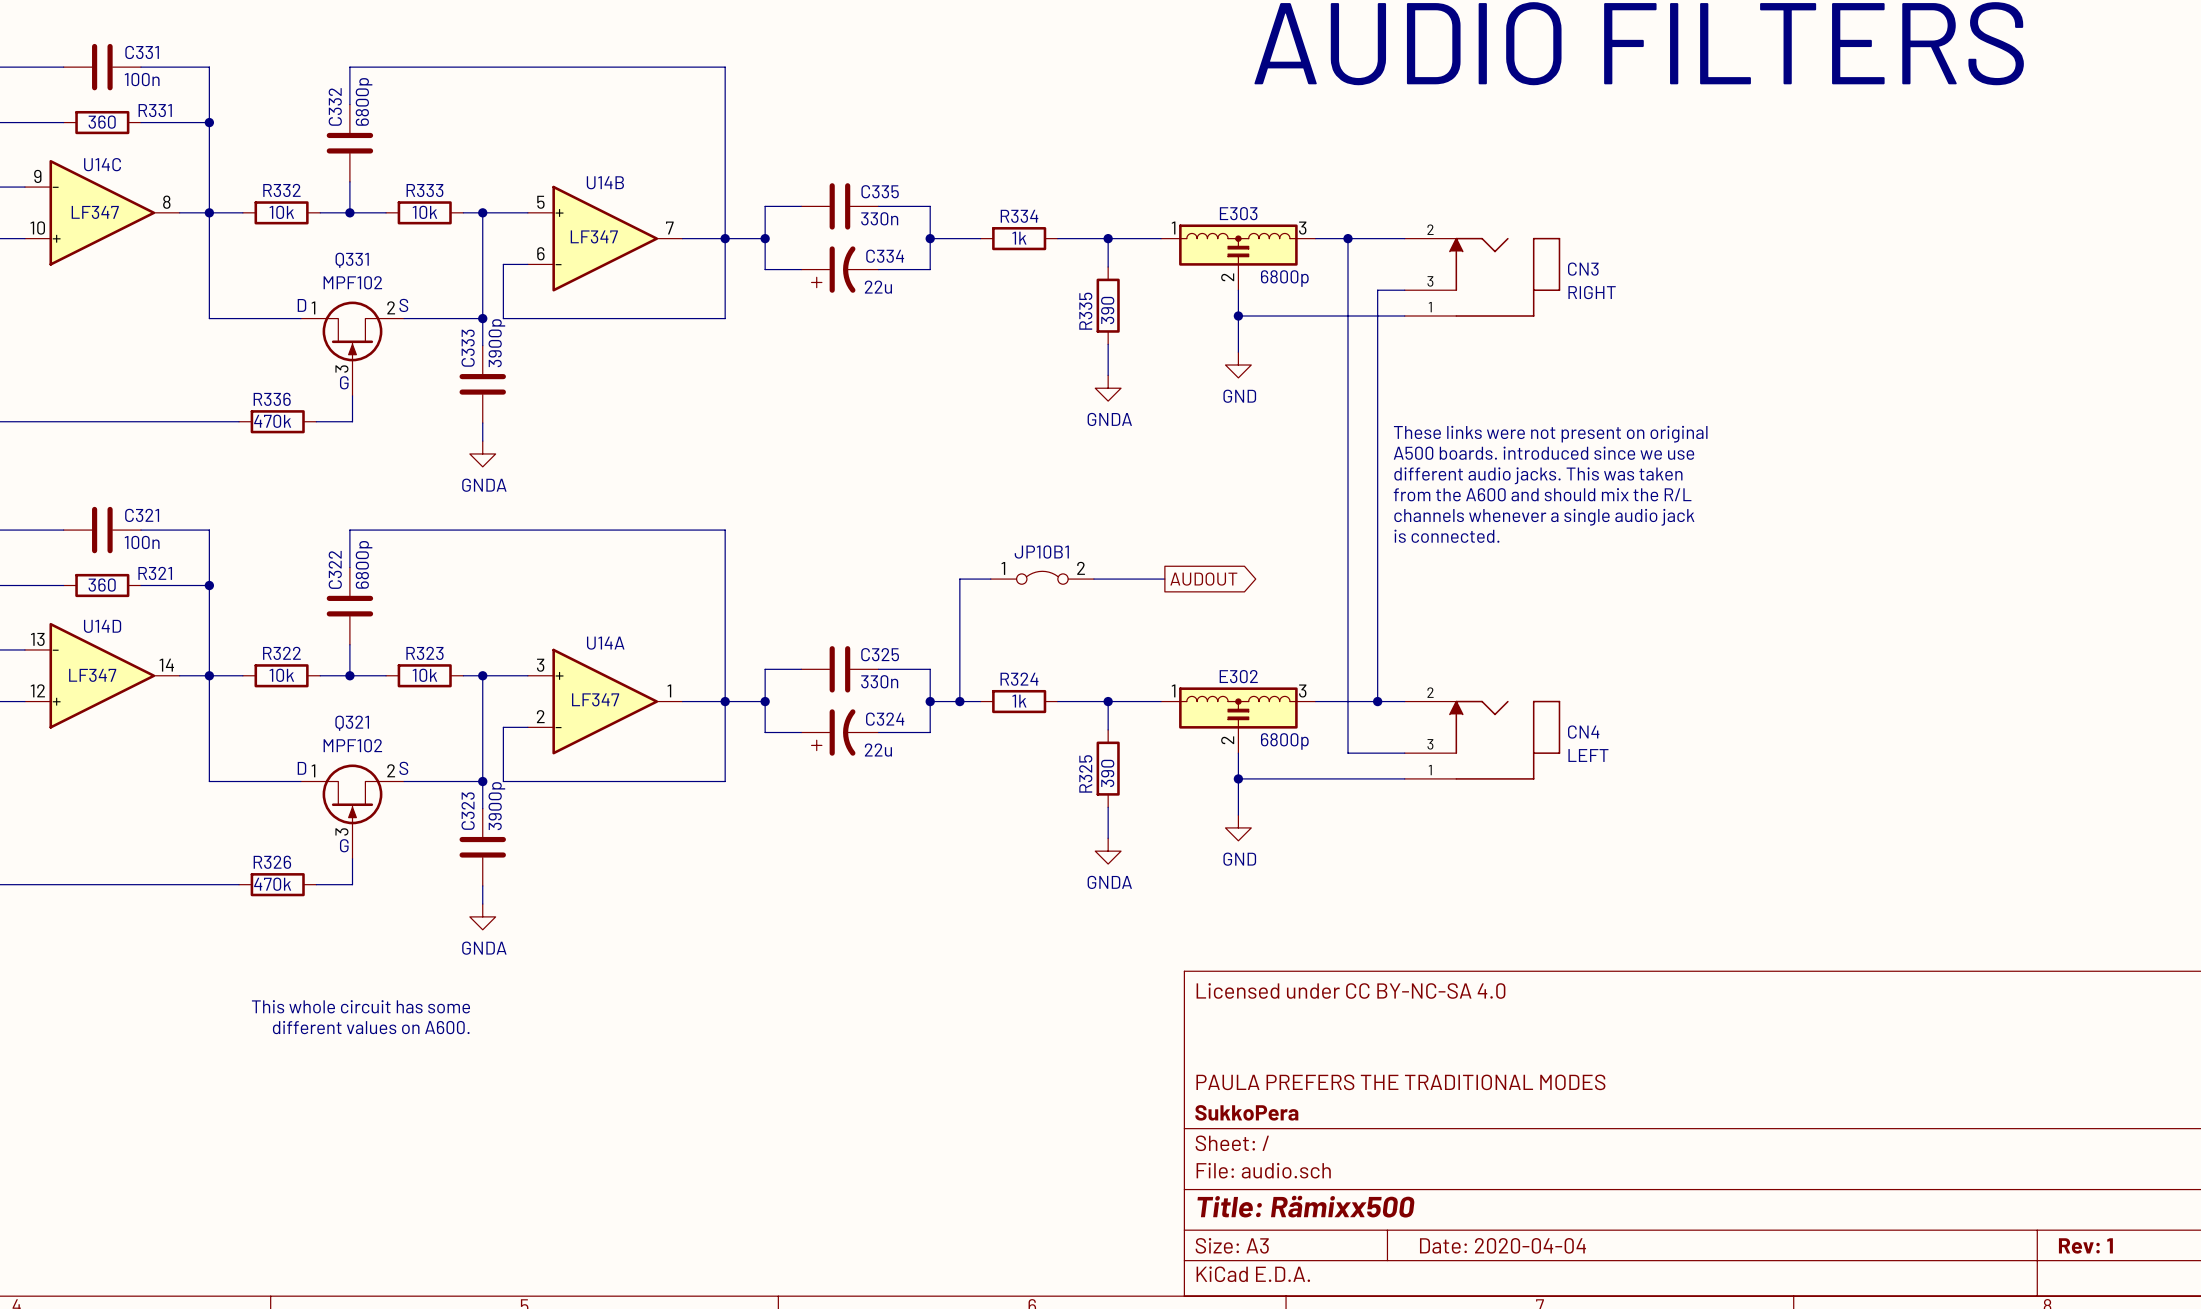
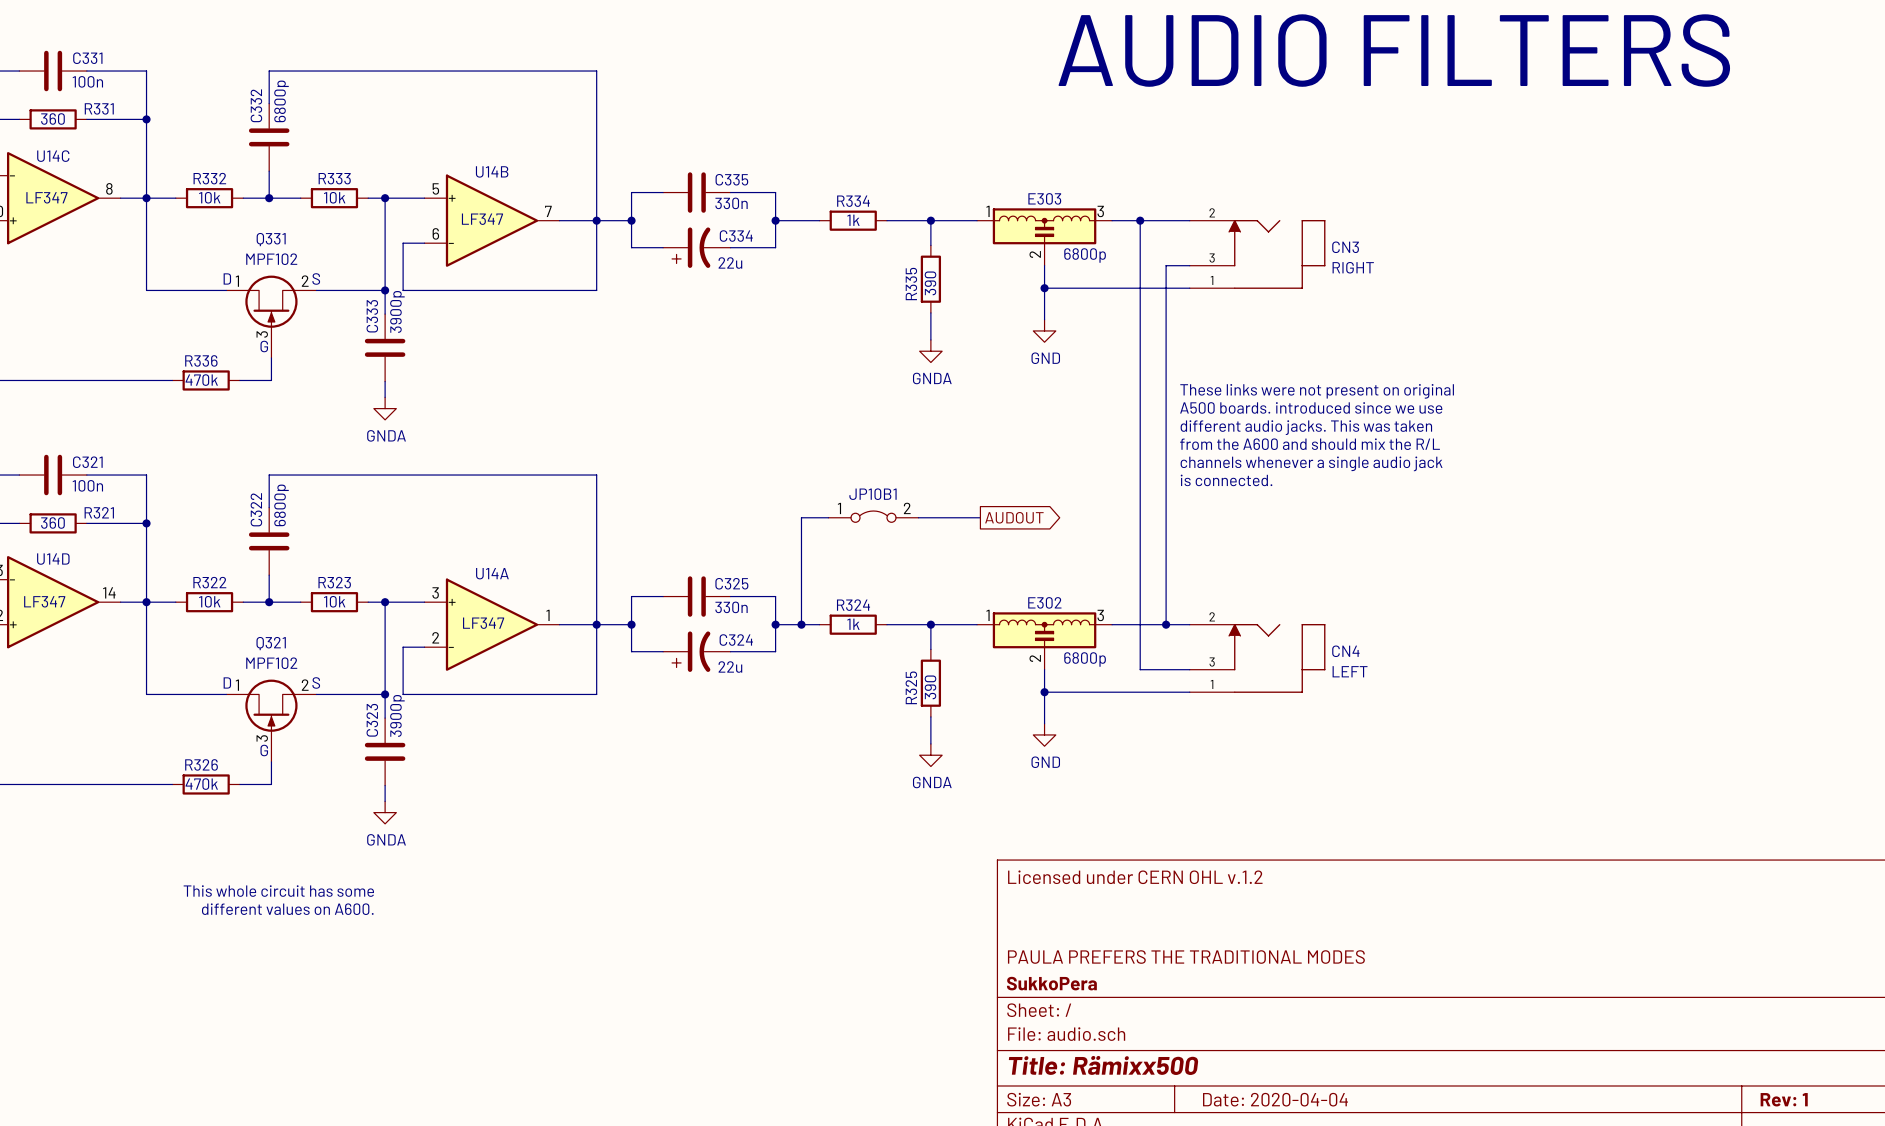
title block: Licensed under CC BY-NC-SA 4.0 (1350, 990) -> Licensed under CERN OHL v.1.2 (1135, 877)

